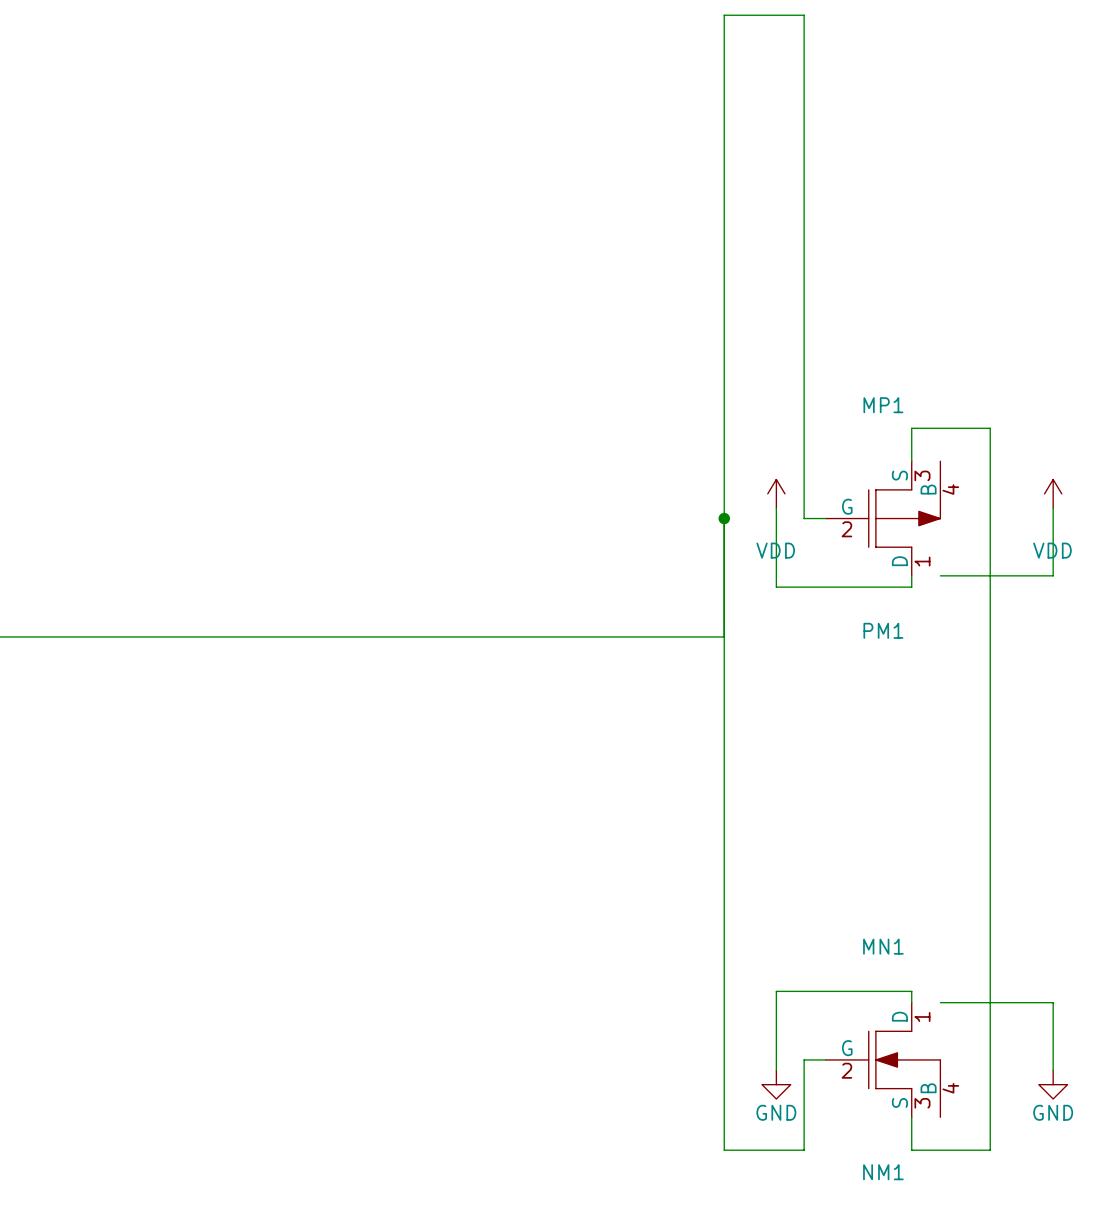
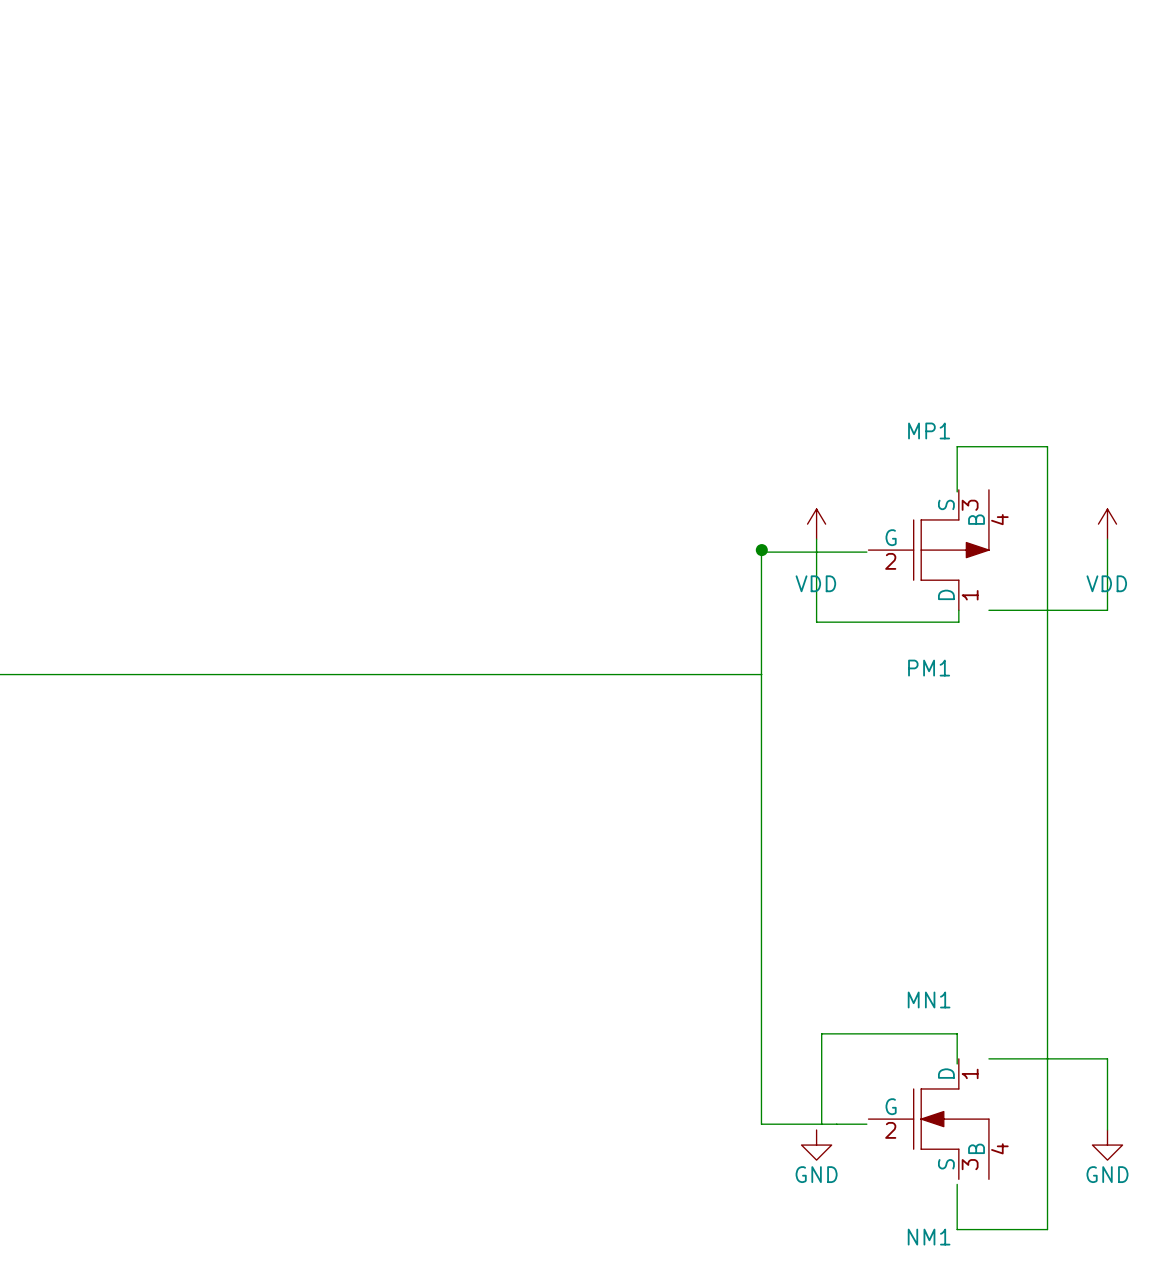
wire: (911, 461) (911, 428) (990, 428) (990, 1150) (911, 1150) (911, 1117) -> none
wire: none -> (957, 491) (957, 446) (1047, 446) (1047, 1229) (957, 1229) (957, 1184)
wire: (825, 518) (804, 518) (804, 15) (724, 15) (724, 1150) (804, 1150) (804, 1059) (825, 1059) -> none
wire: none -> (866, 552) (761, 552) (761, 1124) (866, 1124)
wire: (911, 1002) (911, 991) (776, 991) (776, 1070) -> none
wire: none -> (957, 1063) (957, 1033) (821, 1033) (821, 1124)

